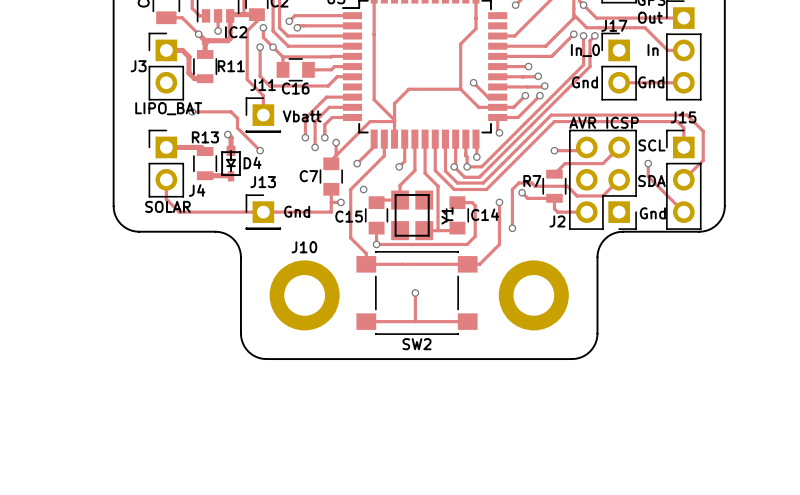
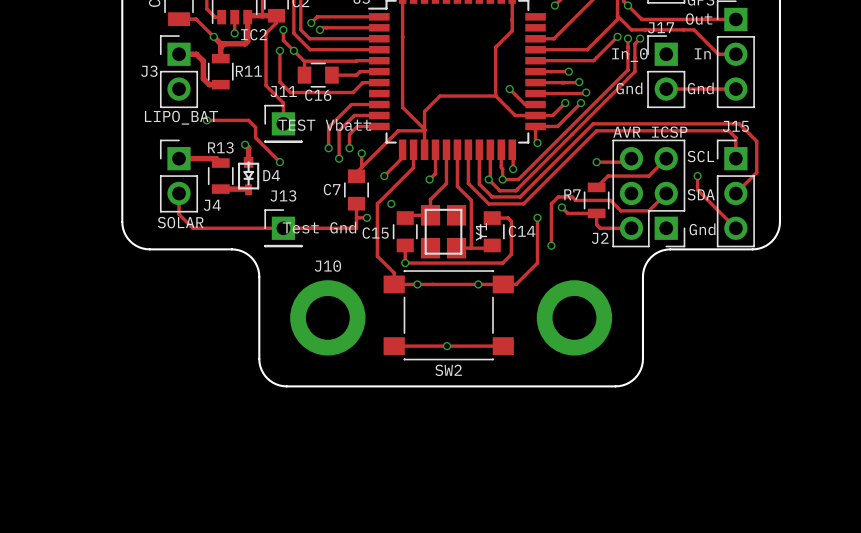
J11 value: Vbatt (302, 116) -> TEST Vbatt (324, 124)
J13 value: Gnd (297, 211) -> Test Gnd (319, 227)
via: none -> (417, 284)
via: none -> (478, 284)
track: (415, 292) (415, 321) -> none
via: (415, 292) -> none
via: none -> (446, 346)

